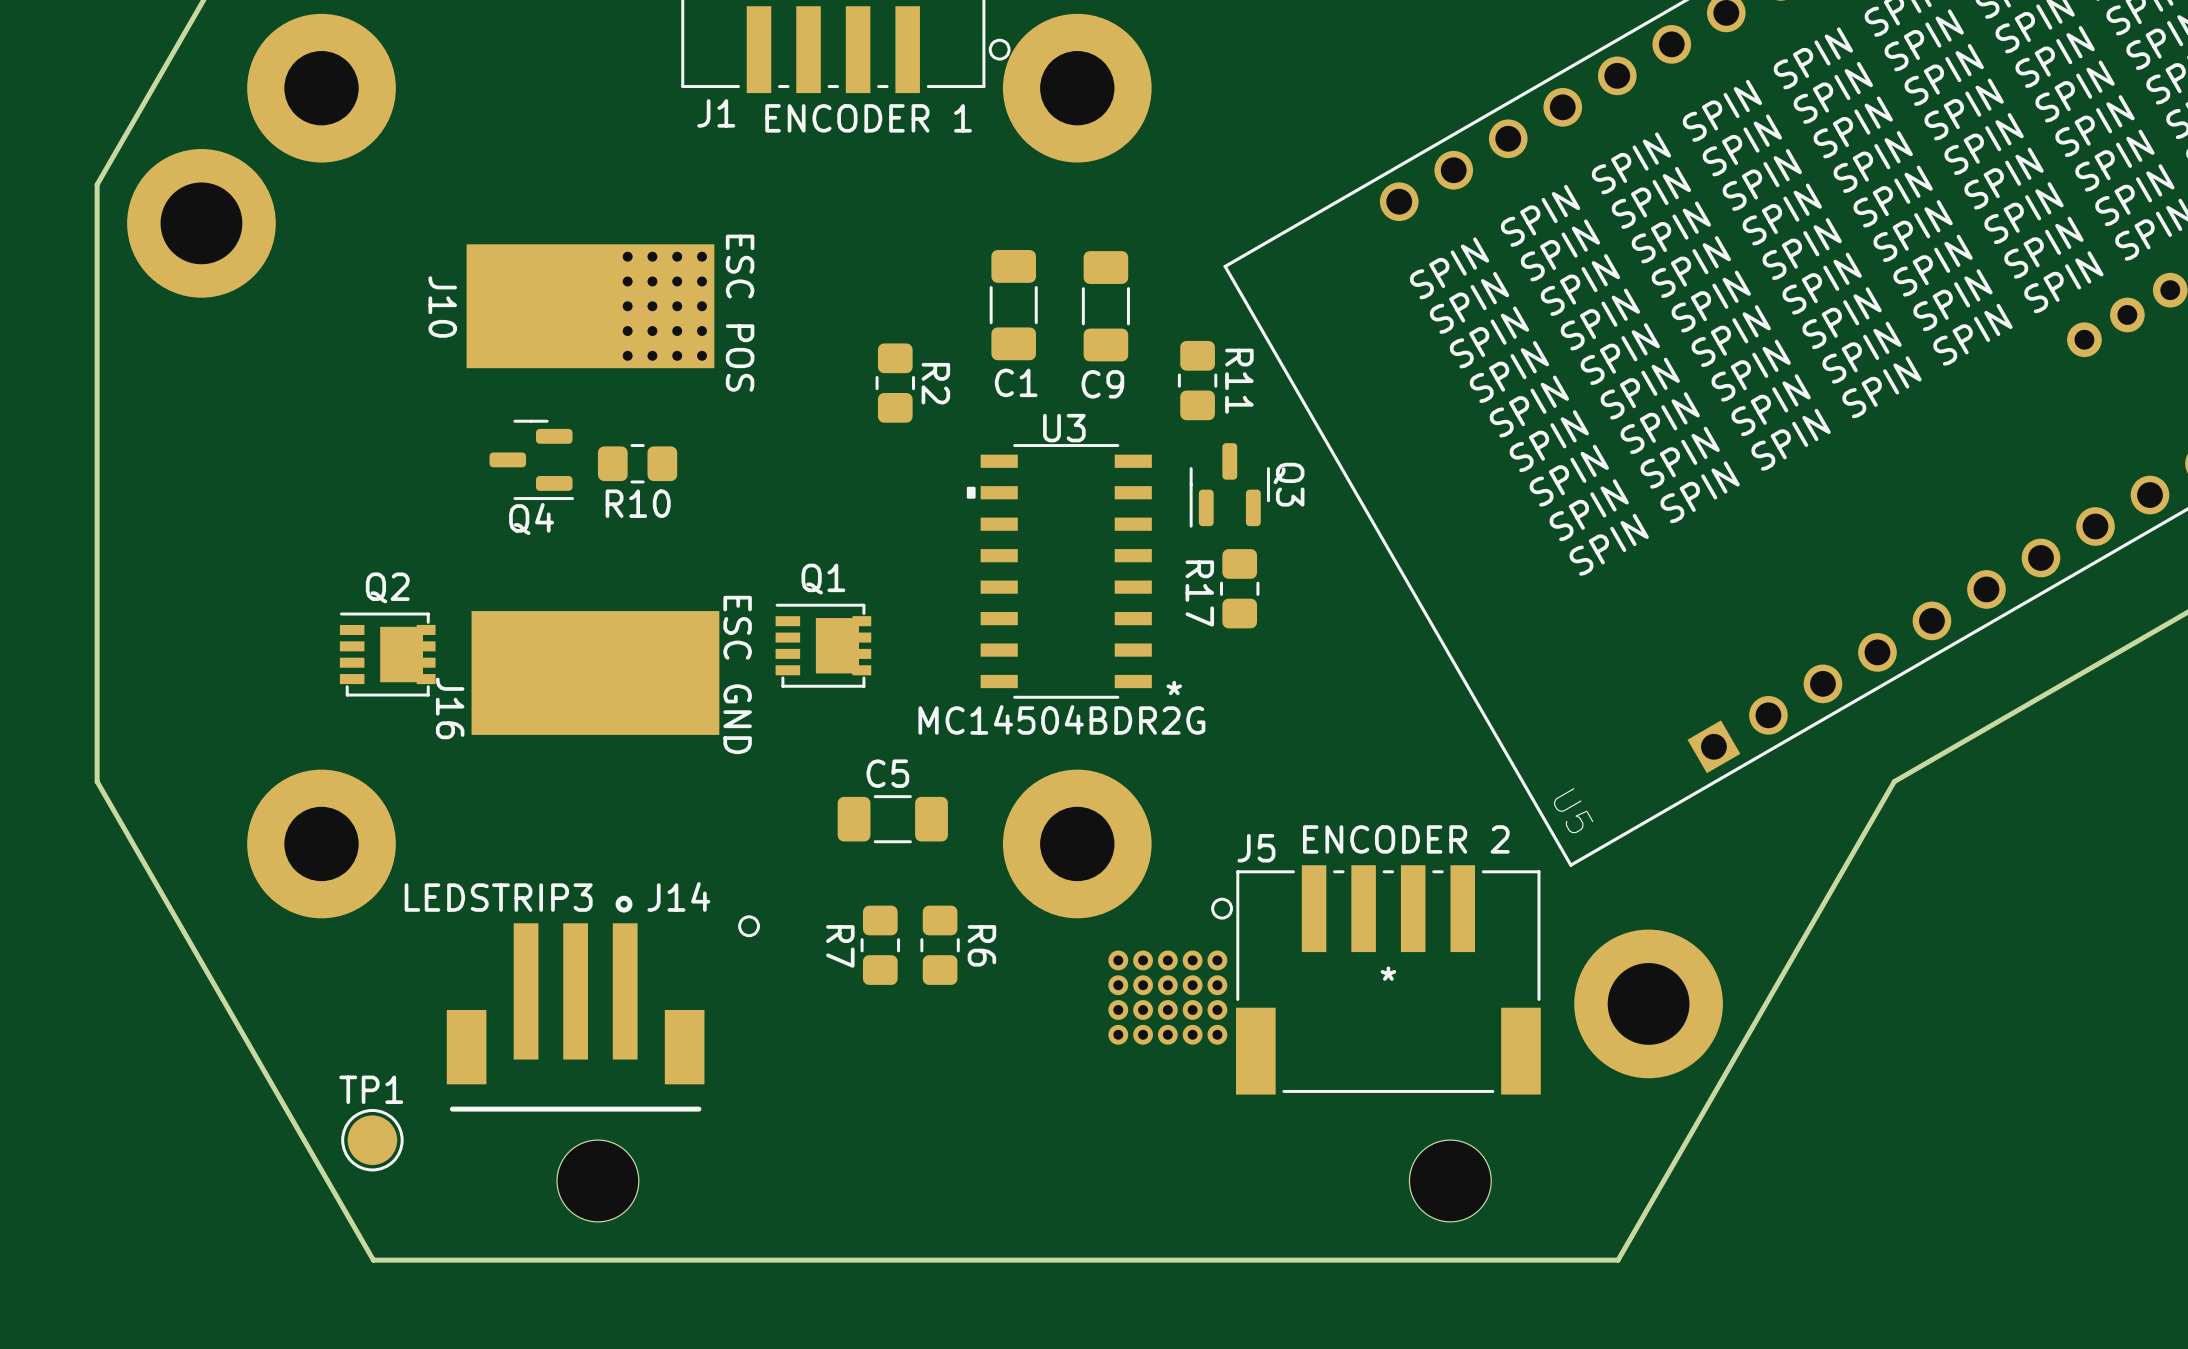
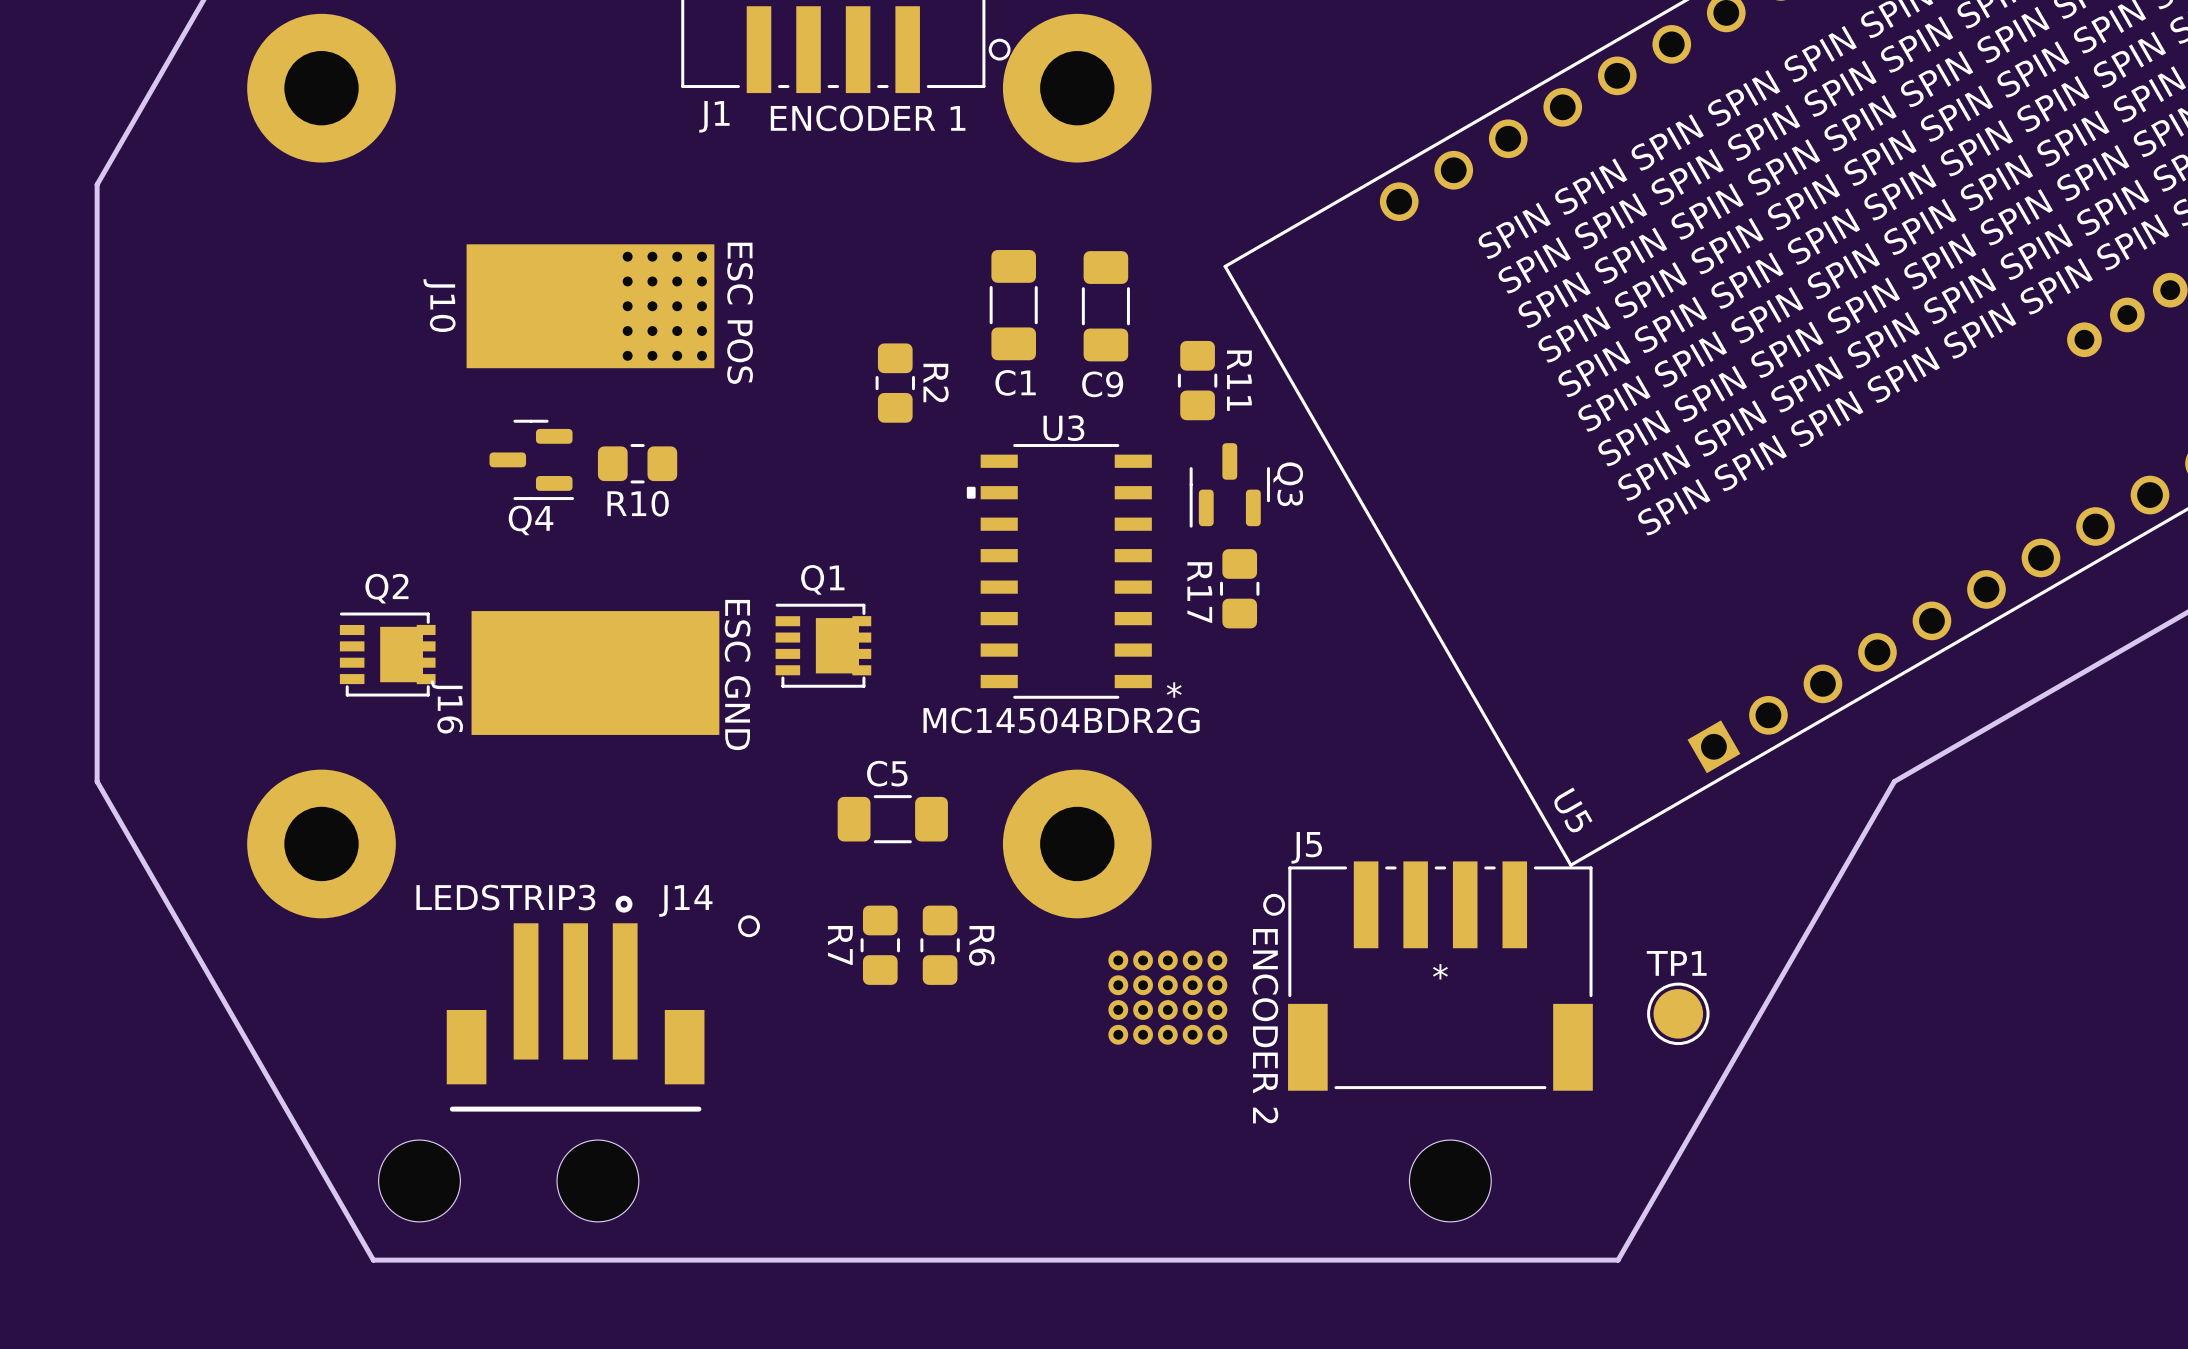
part: (201, 223) -> none
J5 value rotation: 0° (1406, 839) -> 90° clockwise (1265, 1026)
J5 position: (1375, 979) -> (1428, 976)
part: (1648, 1003) -> none
TP1 position: (372, 1140) -> (1678, 1013)
part: none -> (419, 1180)

